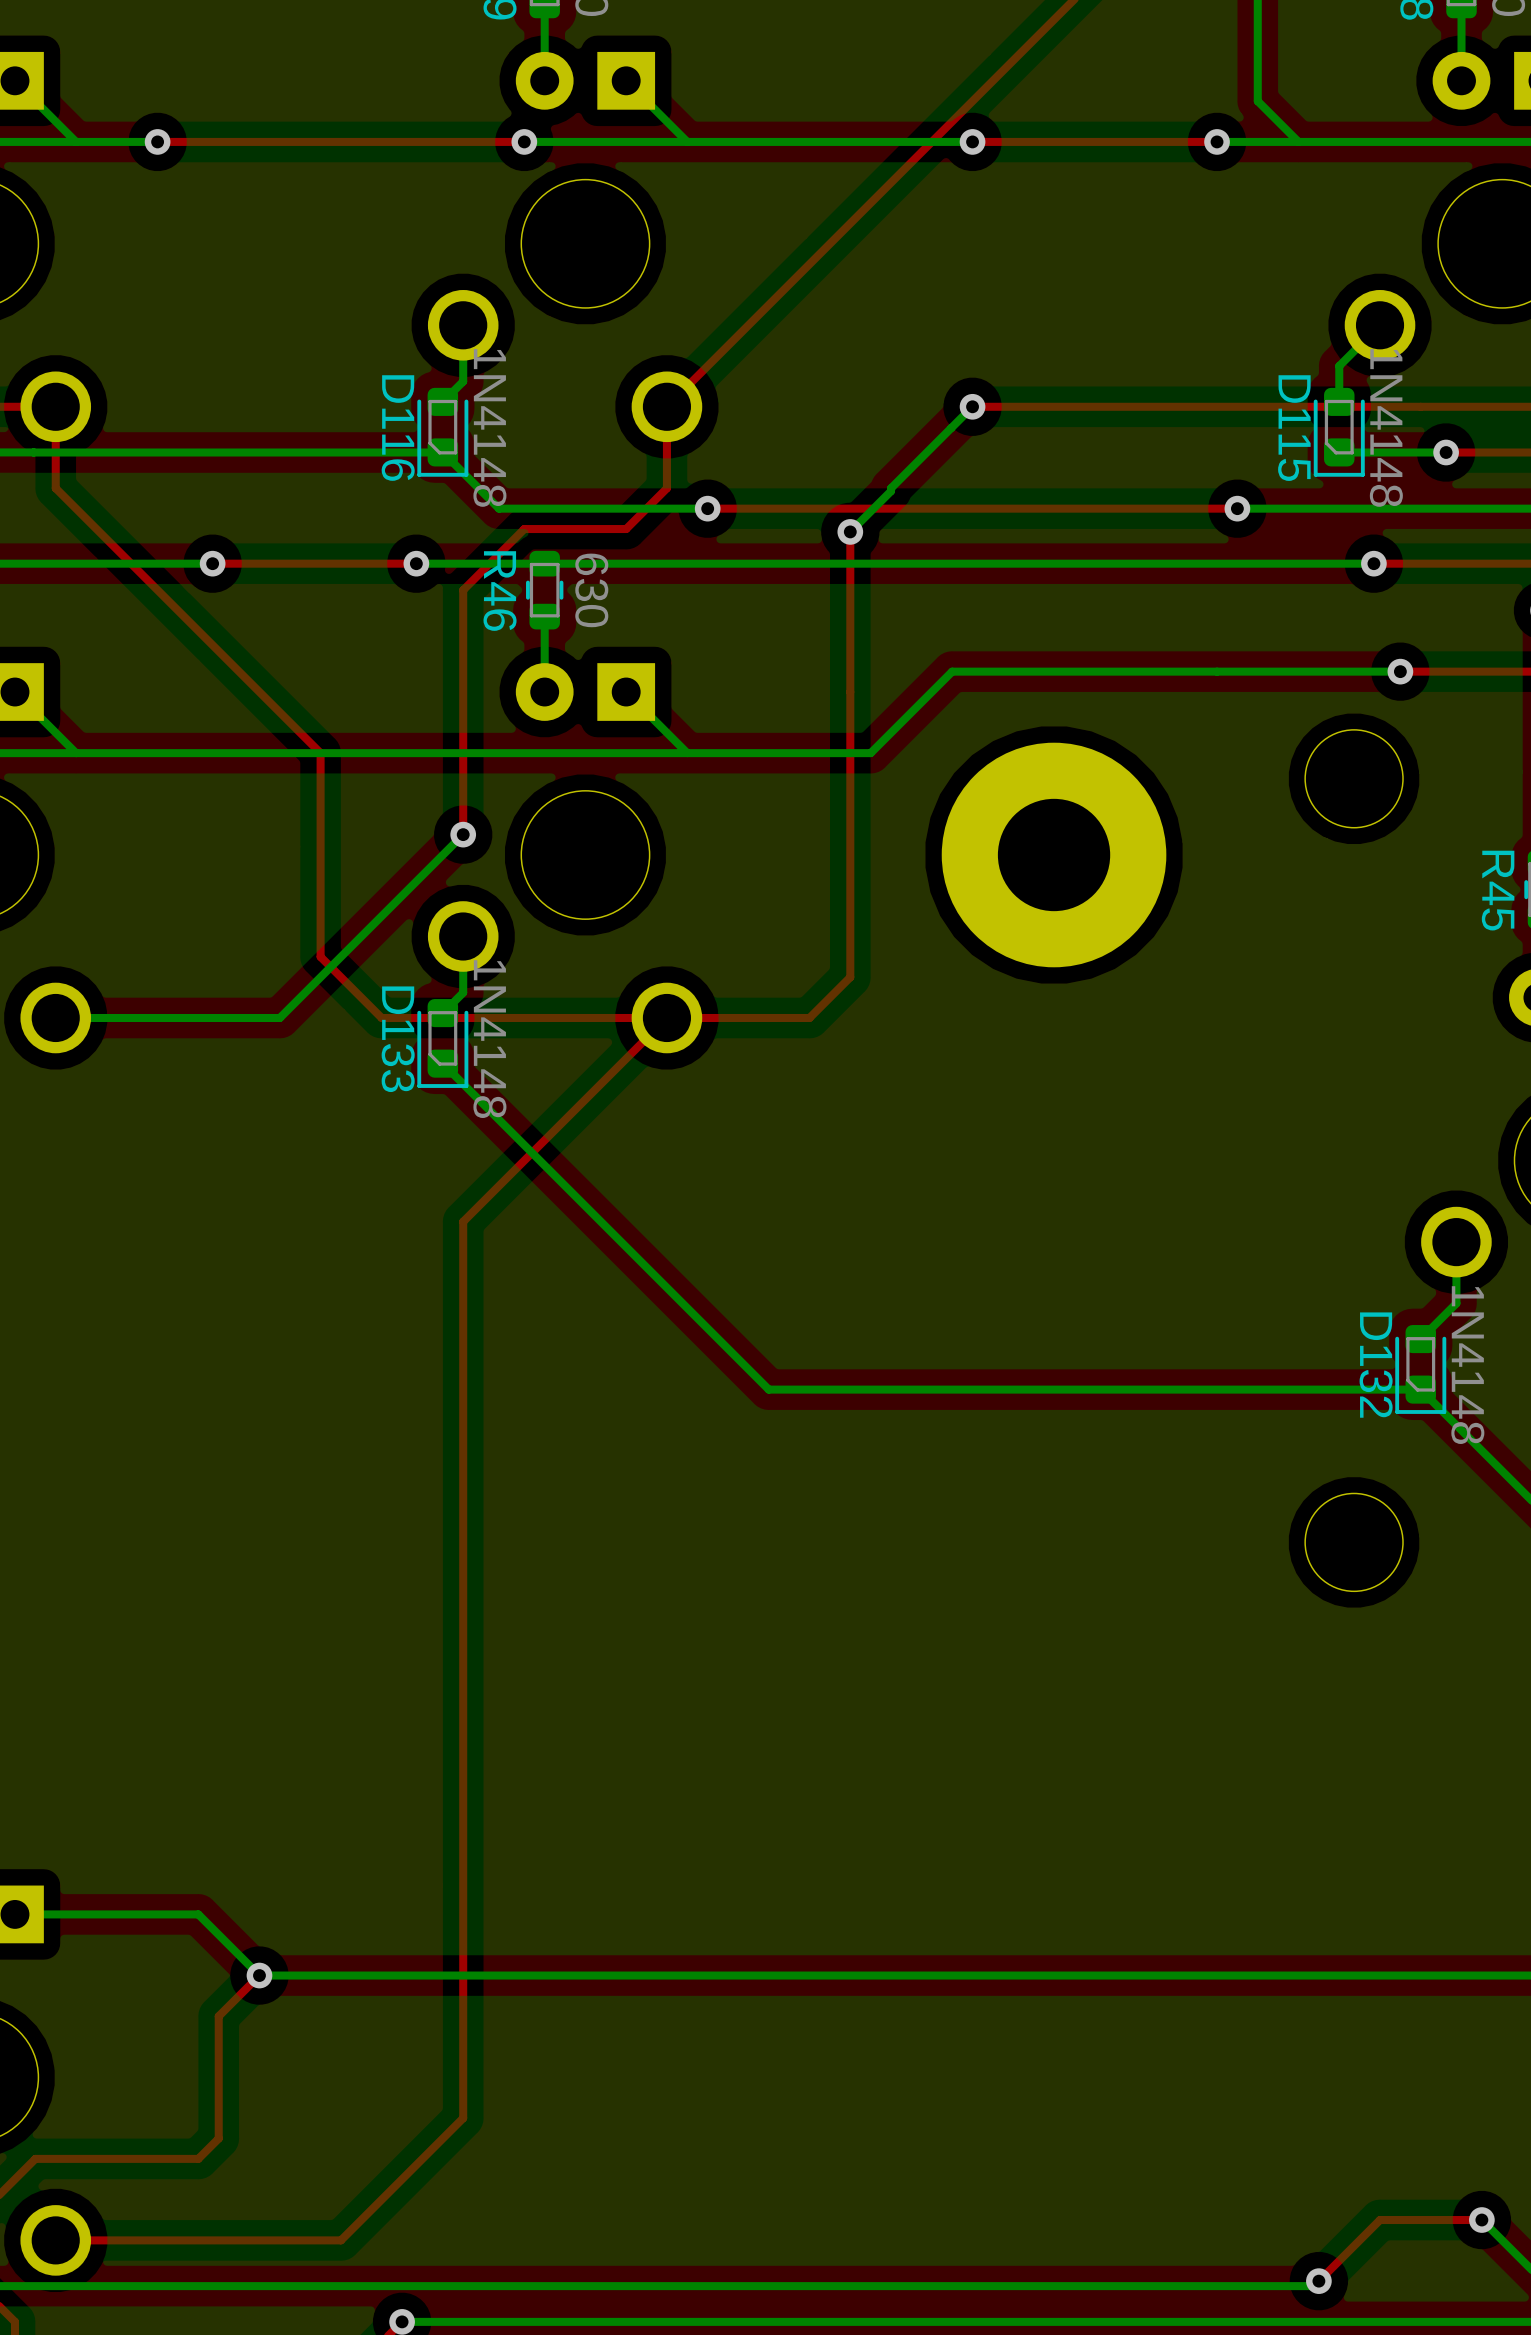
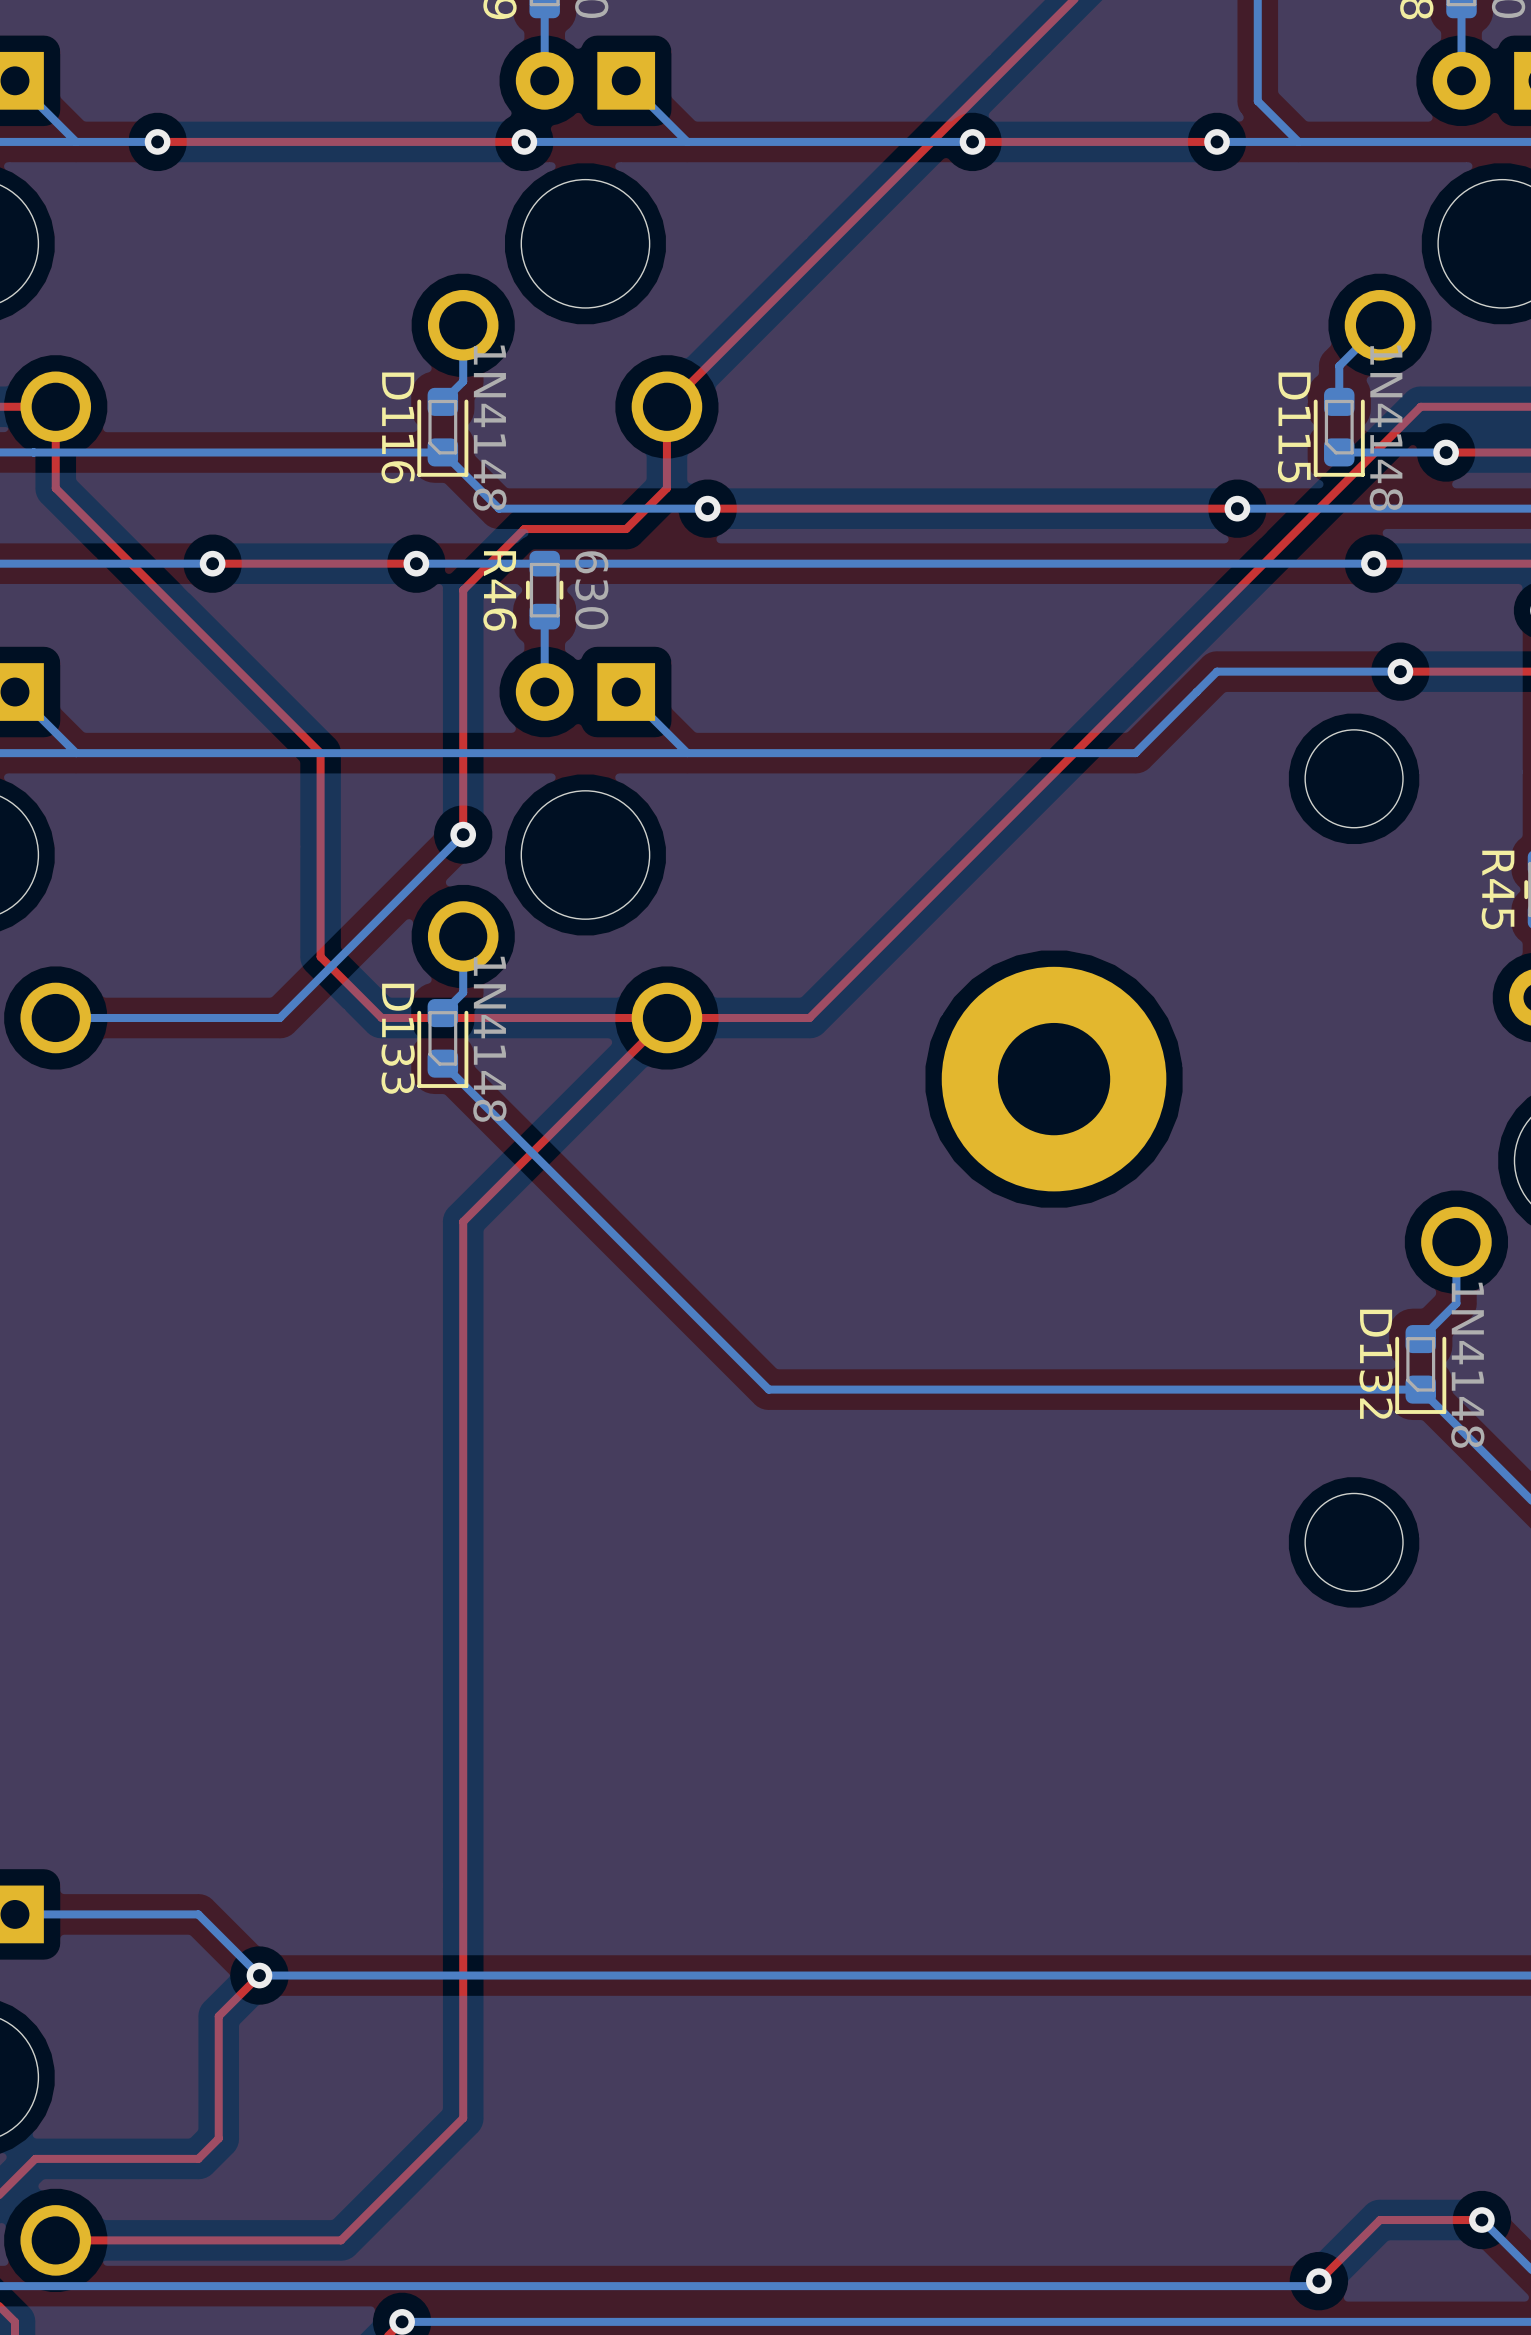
bottom track: (972, 406) (850, 531) -> none
via: (972, 406) -> none
top track: (1420, 406) (972, 406) -> (1420, 406) (850, 977)
top track: (850, 531) (850, 977) -> none
via: (850, 531) -> none
bottom track: (1217, 671) (952, 671) (870, 753) -> (1217, 671) (1135, 753) (870, 753)
part position: (1054, 855) -> (1054, 1079)

